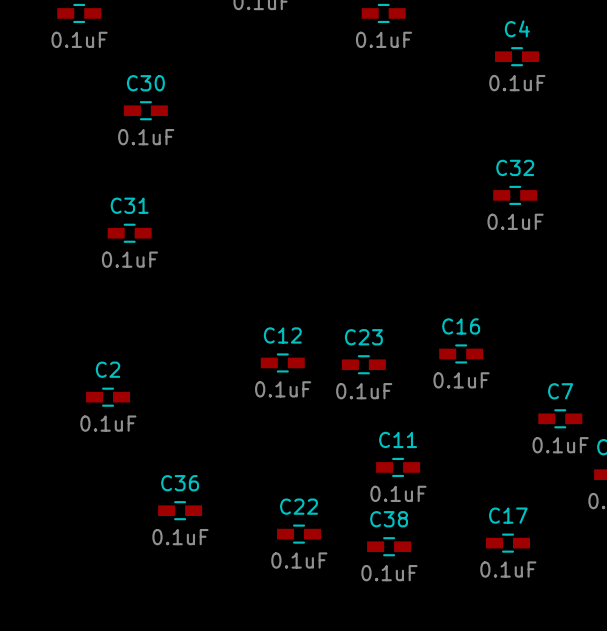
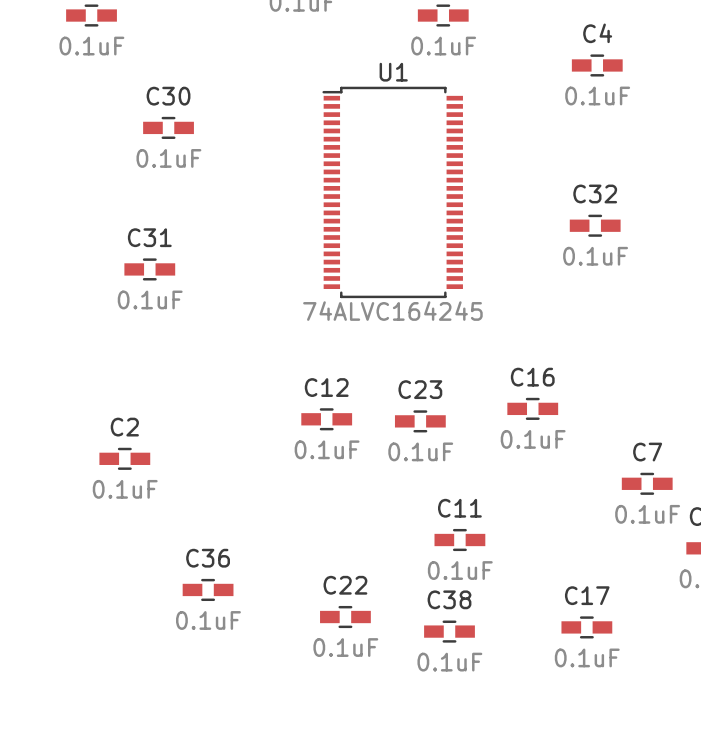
U1: none -> 74ALVC164245 (392, 192)

